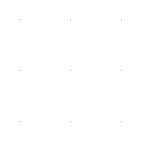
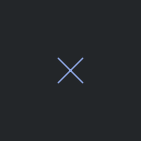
no-connect mark: none -> (70, 70)

